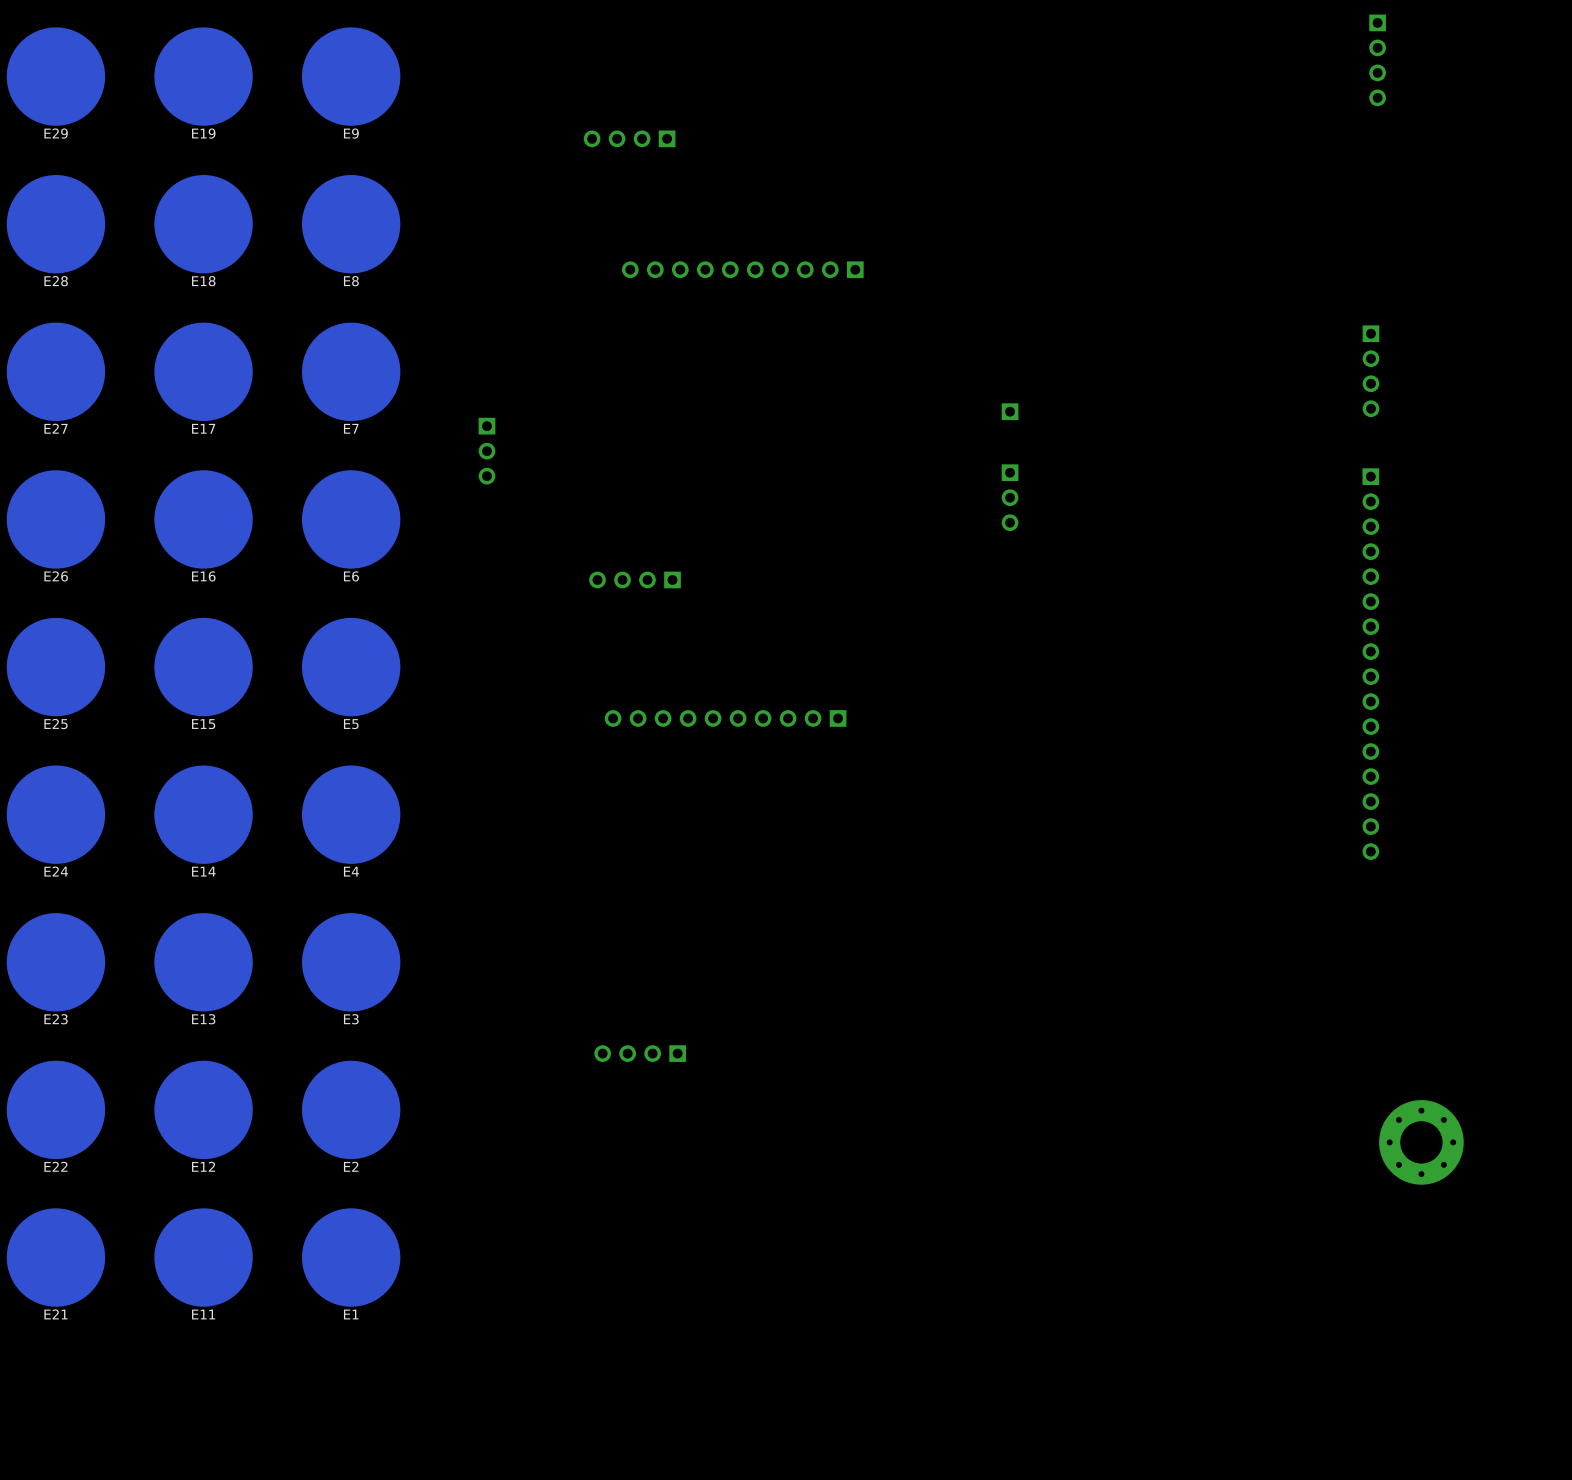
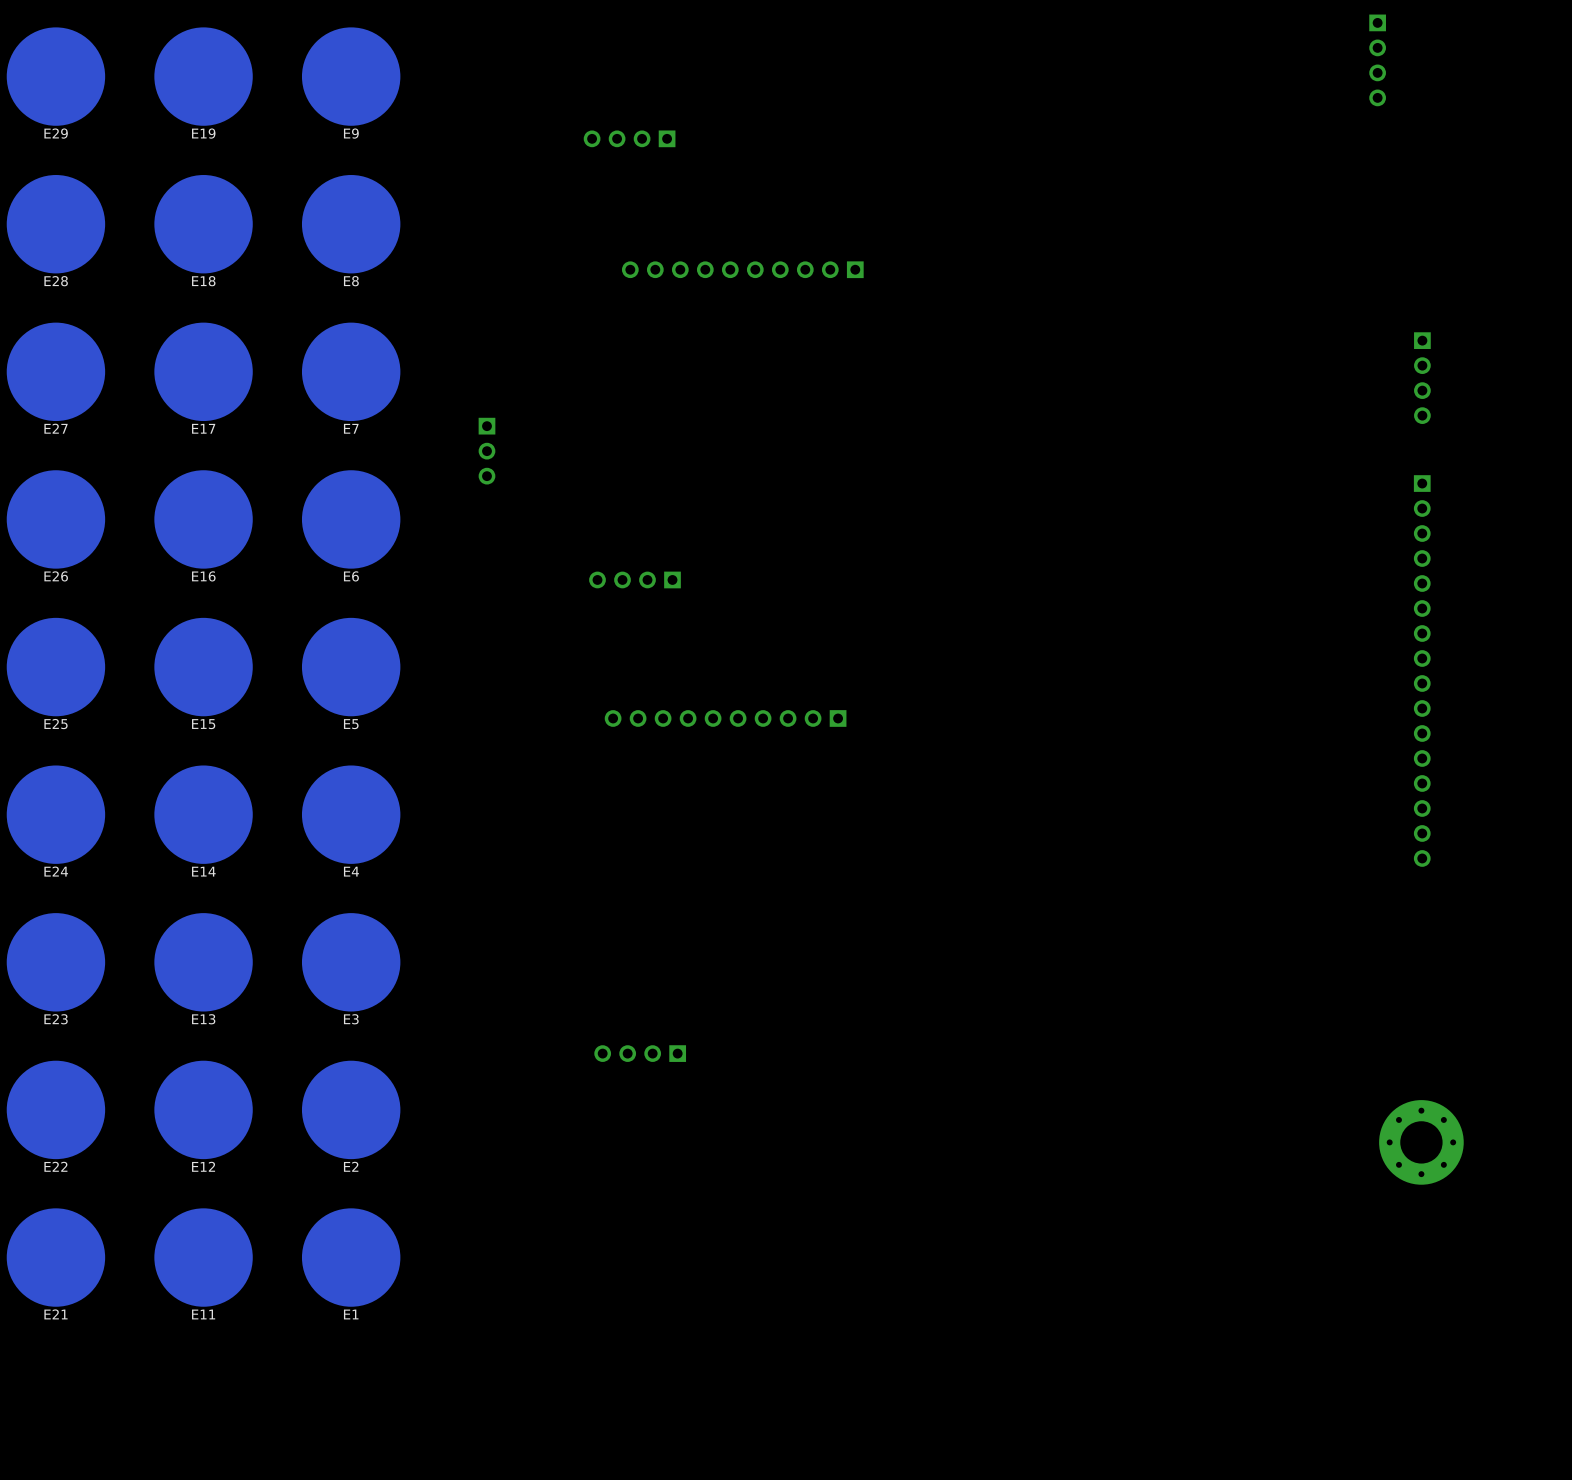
part position: (1370, 371) -> (1422, 378)
part: (1010, 411) -> none
part: (1010, 497) -> none
part position: (1370, 664) -> (1422, 671)

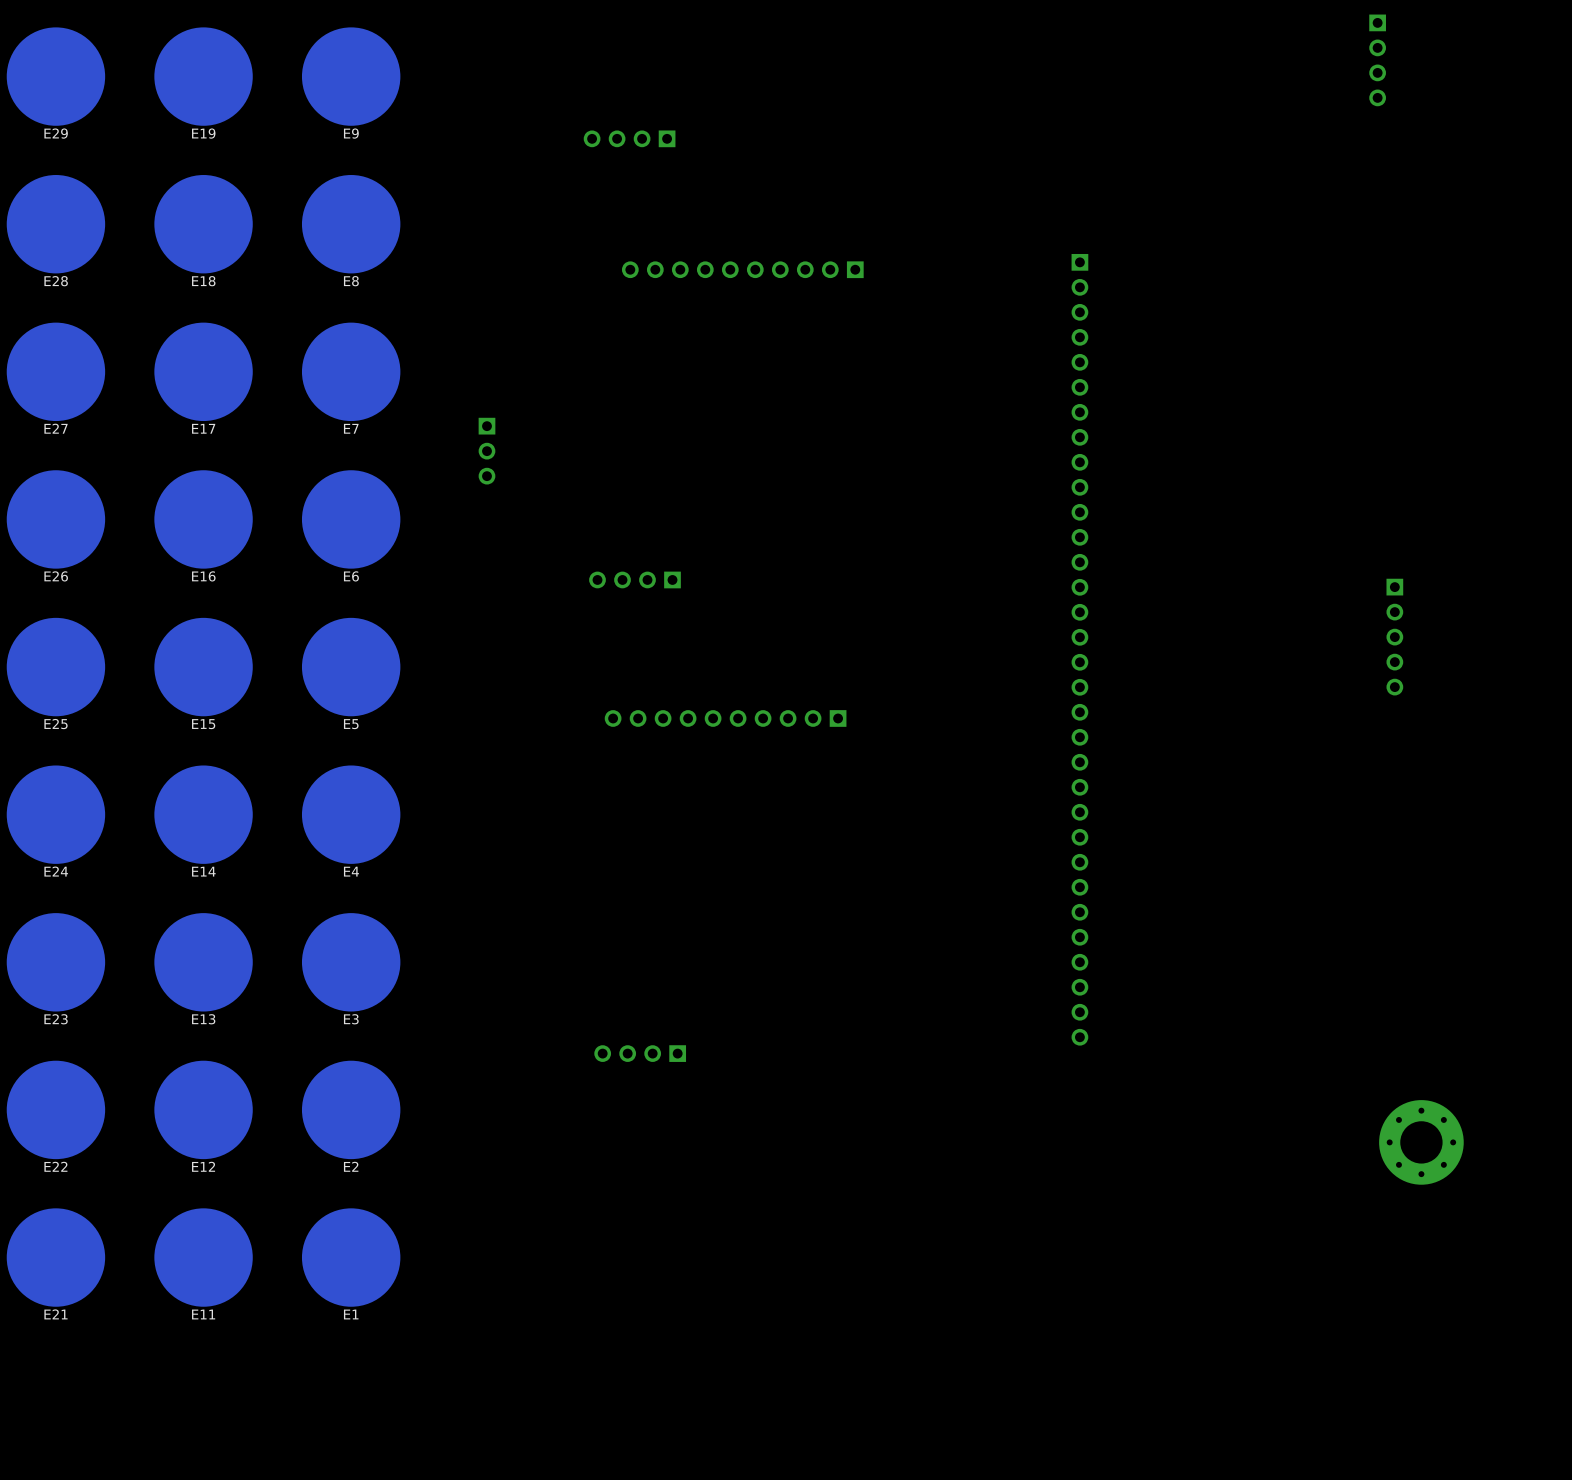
part: (1422, 378) -> none
part: none -> (1394, 637)
part: none -> (1079, 649)
part: (1422, 671) -> none

